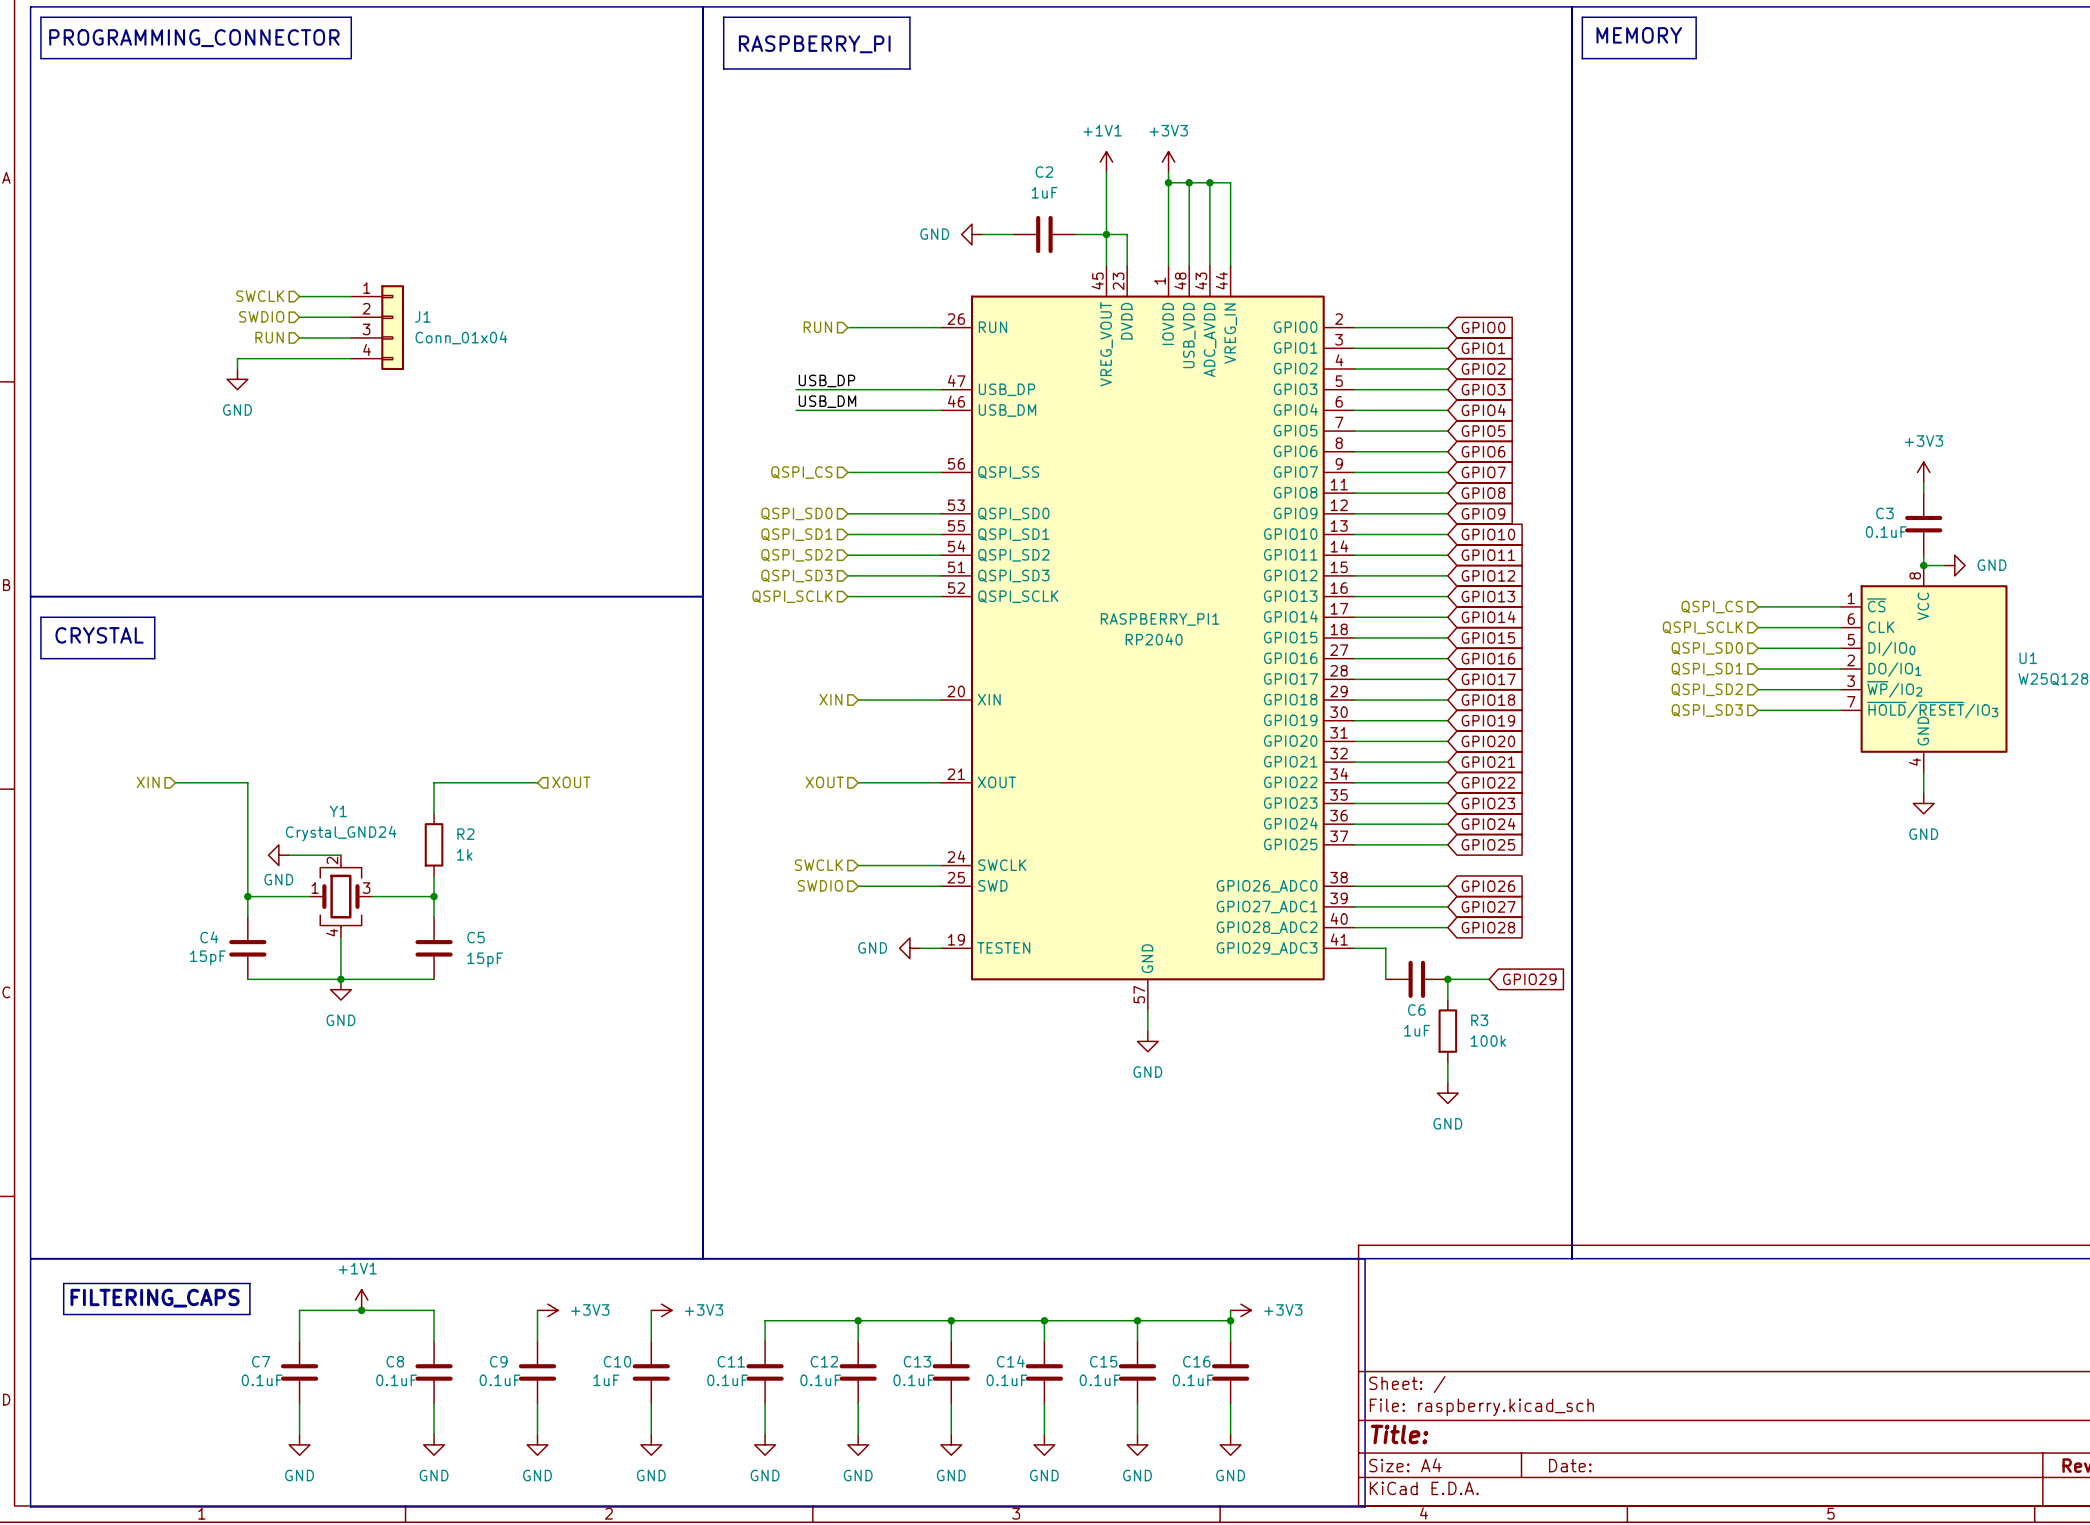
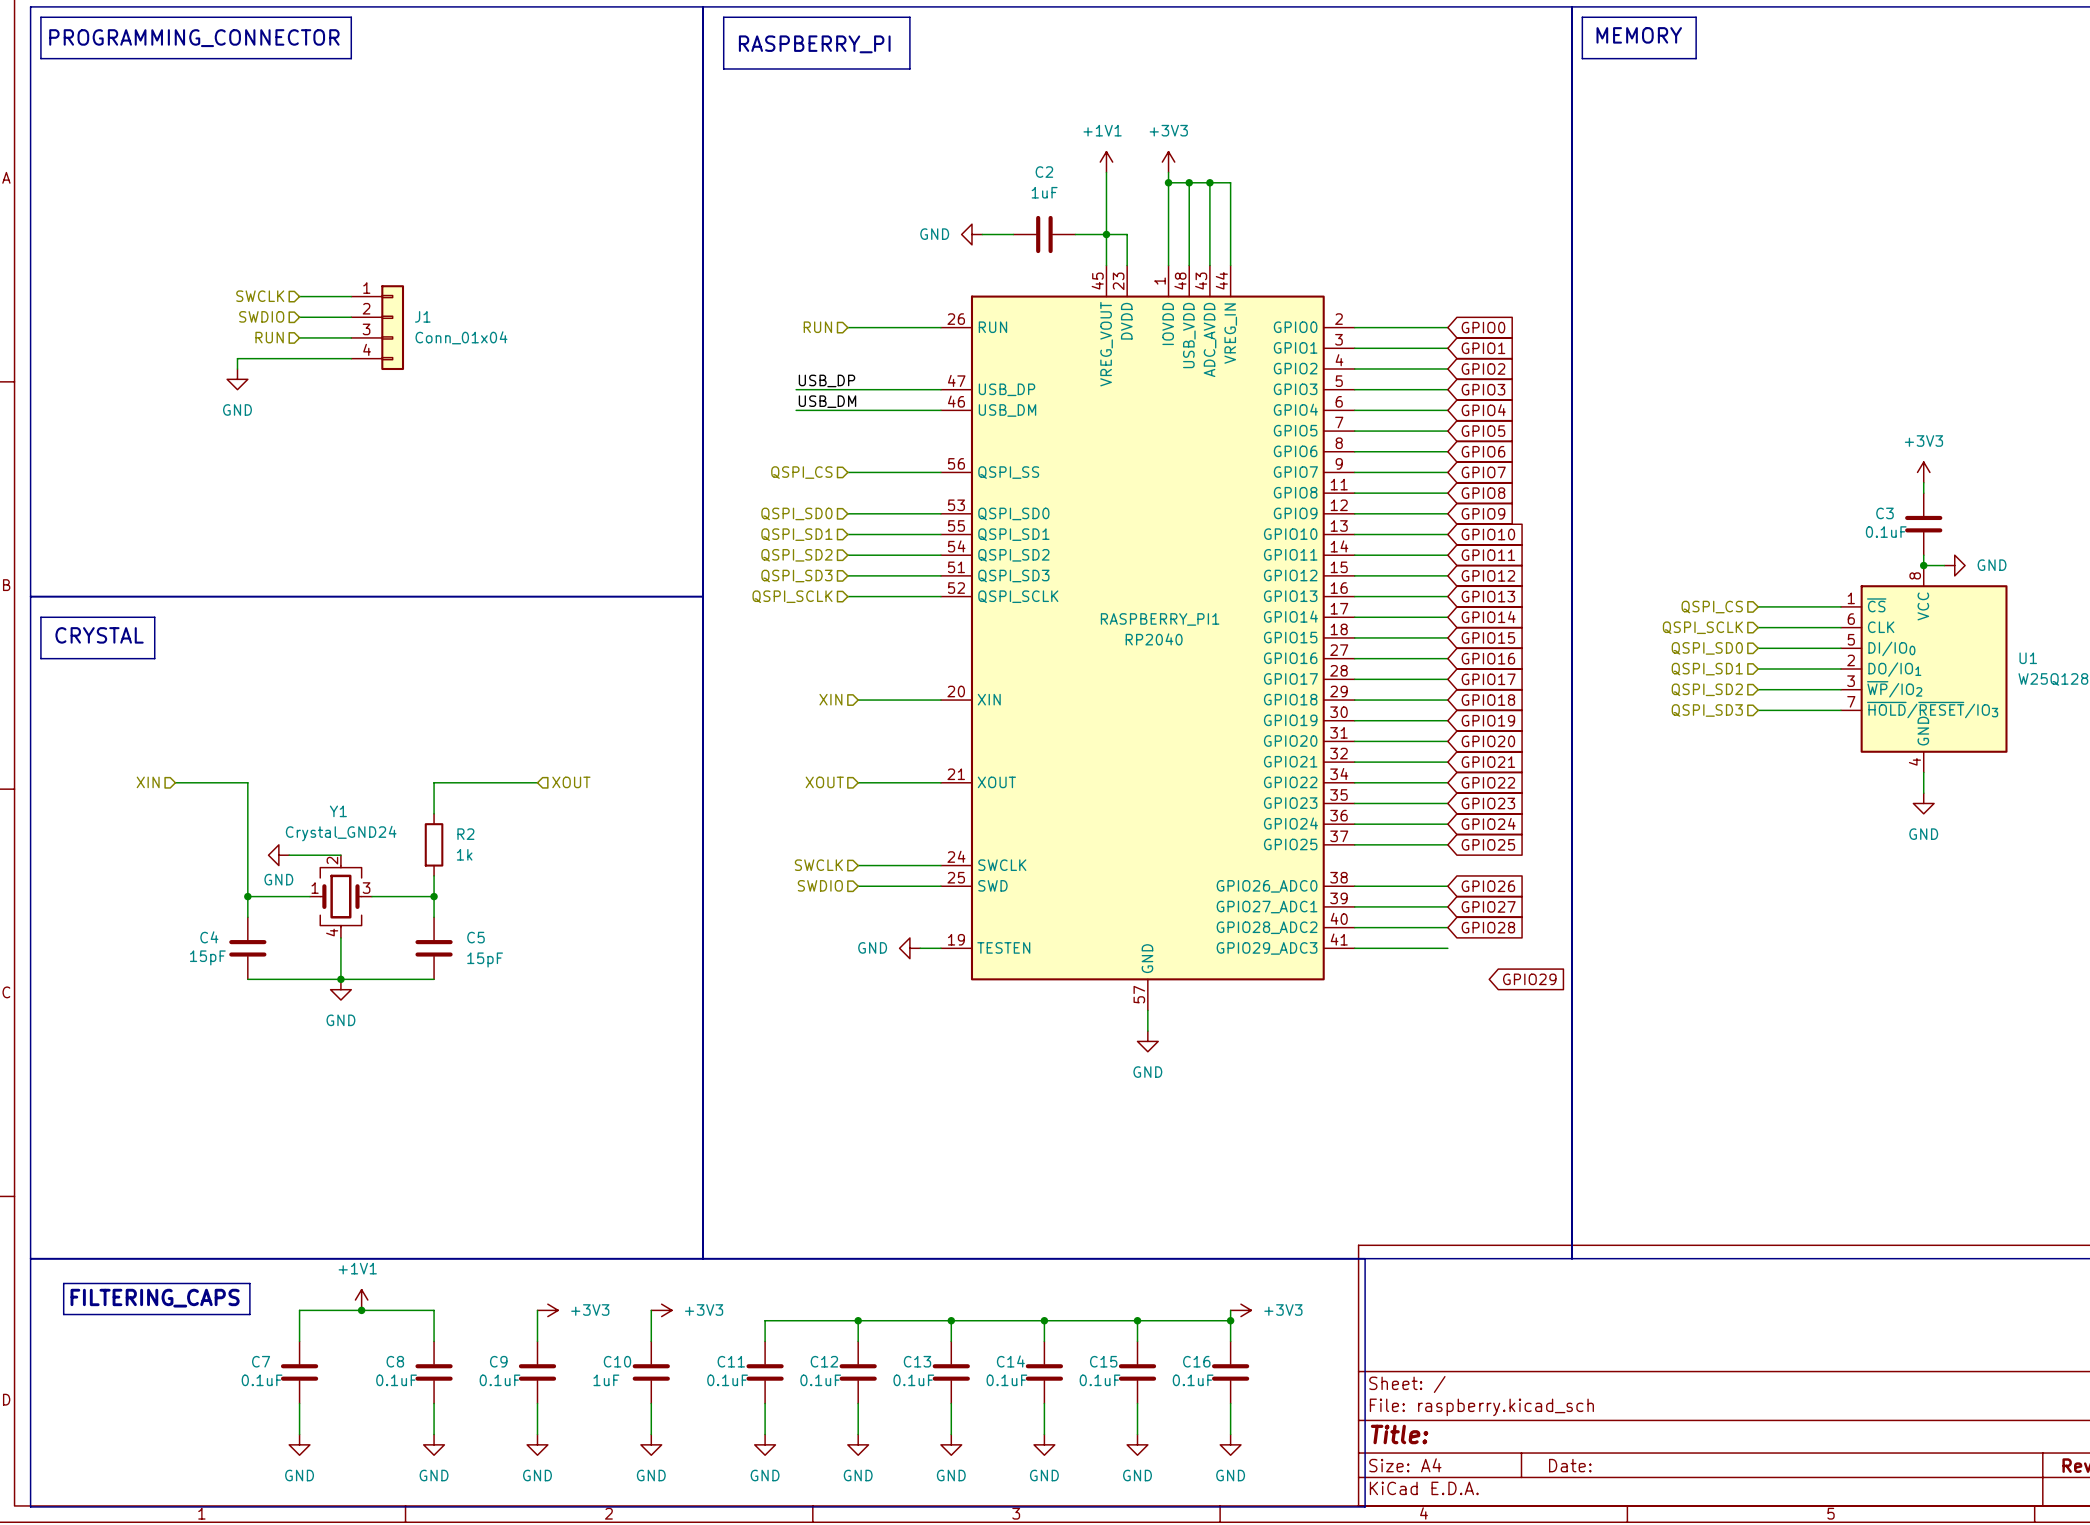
wire: (1385, 948) (1385, 979) -> (1385, 948) (1447, 948)
C6: 1uF (1416, 979) -> none
junction: (1447, 979) -> none
wire: (1489, 979) (1447, 979) (1447, 1000) -> none
R3: 100k (1447, 1031) -> none
wire: (1447, 1062) (1447, 1082) -> none
power symbol: GND (1447, 1093) -> none

